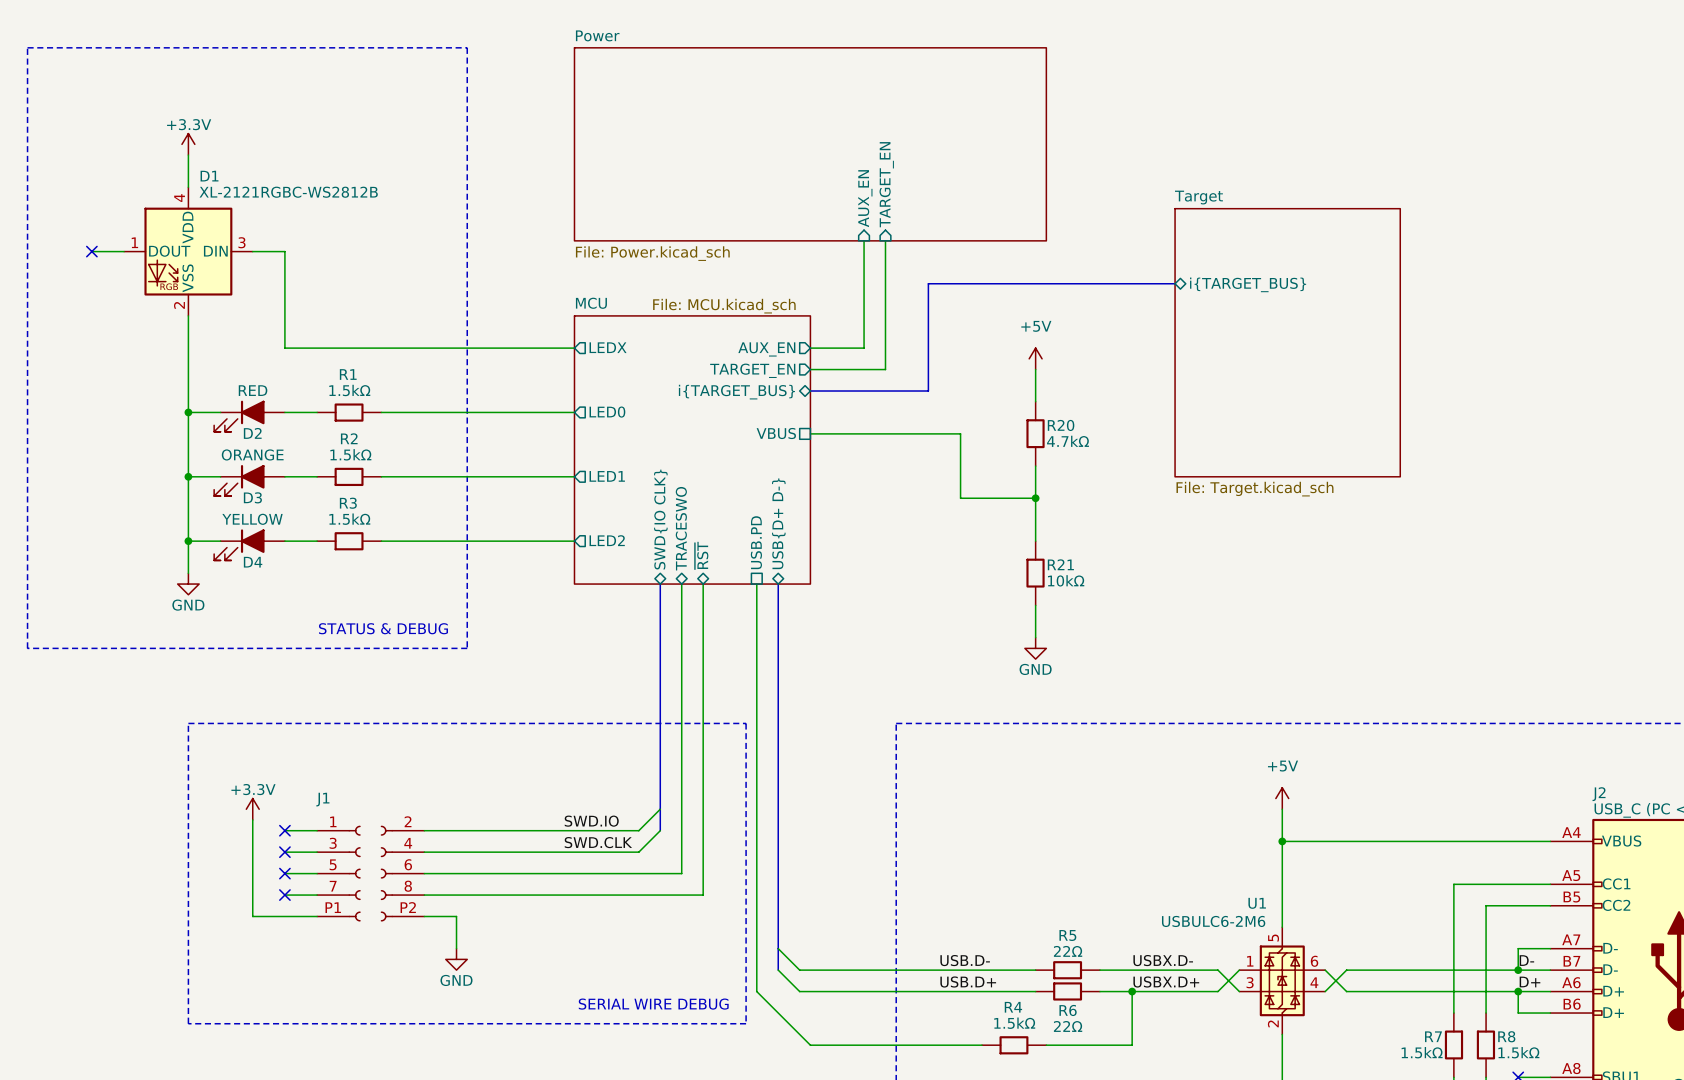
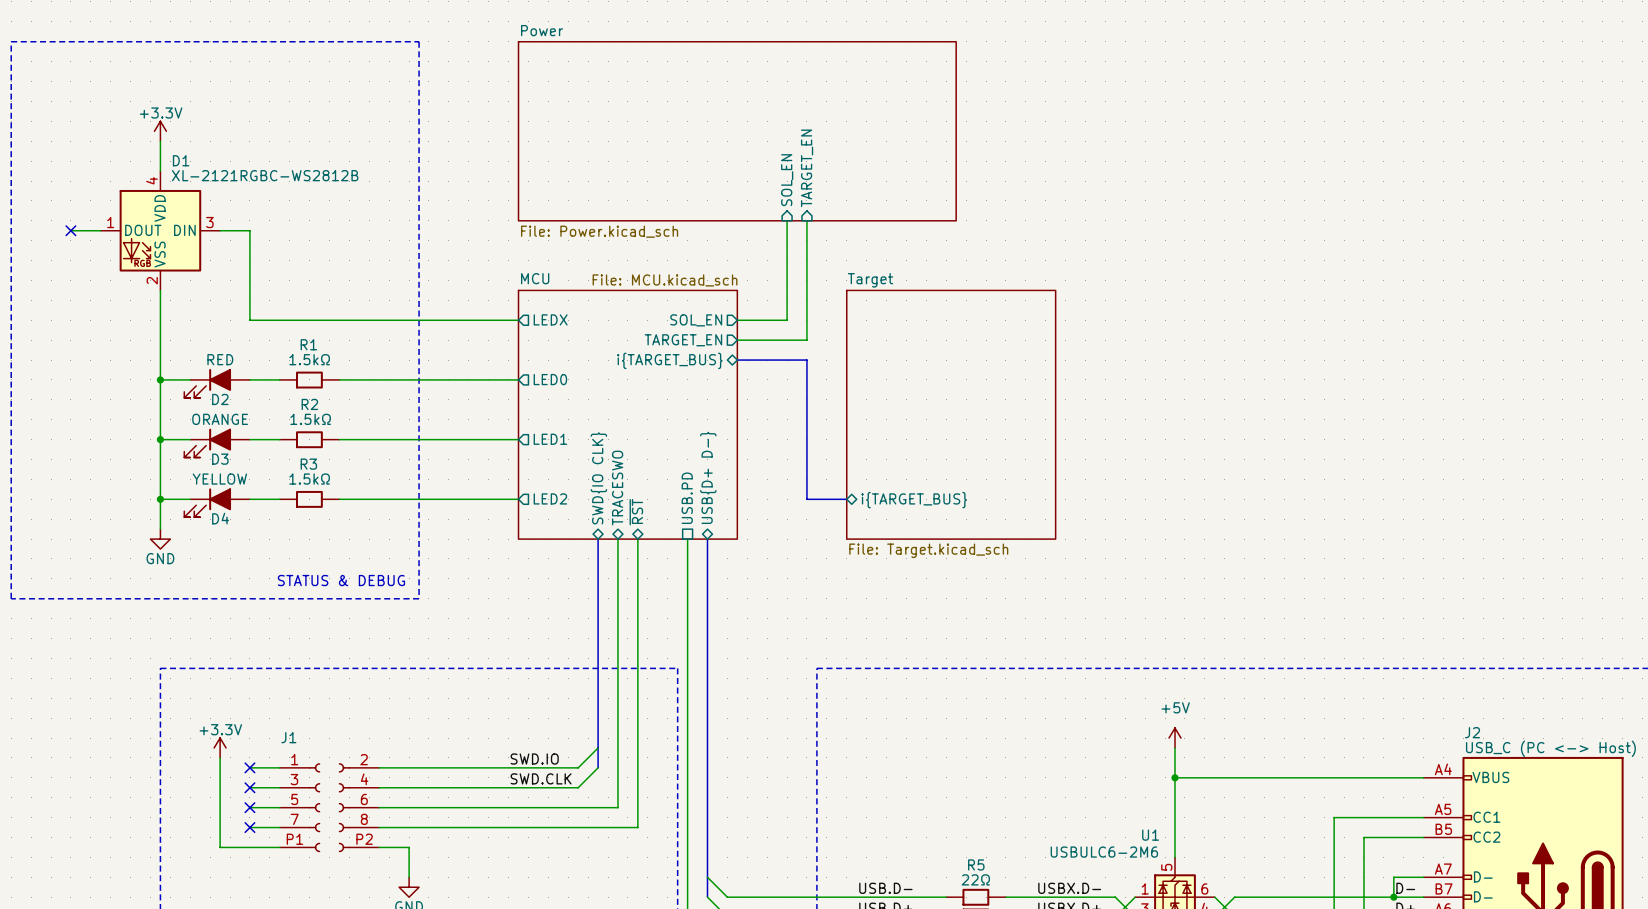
sheet pin: AUX_EN (865, 198) -> SOL_EN (787, 180)
bus: (1175, 283) (928, 283) (928, 391) (885, 391) -> (846, 499) (806, 499) (806, 360)
sheet pin: i{TARGET_BUS} (1248, 284) -> none
sheet Target: File: Target.kicad_sch (1287, 342) -> none
sheet pin: AUX_EN (766, 349) -> SOL_EN (696, 320)
power symbol: +5V (1035, 358) -> none
wire: (1035, 369) (1035, 401) -> none
sheet pin: VBUS (776, 433) -> none
wire: (810, 433) (960, 433) (960, 498) (1035, 498) -> none
R20: 4.7kΩ (1035, 433) -> none
sheet Target: none -> File: Target.kicad_sch (951, 414)
wire: (1035, 466) (1035, 541) -> none
junction: (1035, 498) -> none
sheet pin: none -> i{TARGET_BUS} (914, 500)
R21: 10kΩ (1035, 573) -> none
wire: (1035, 605) (1035, 637) -> none
power symbol: GND (1035, 648) -> none

